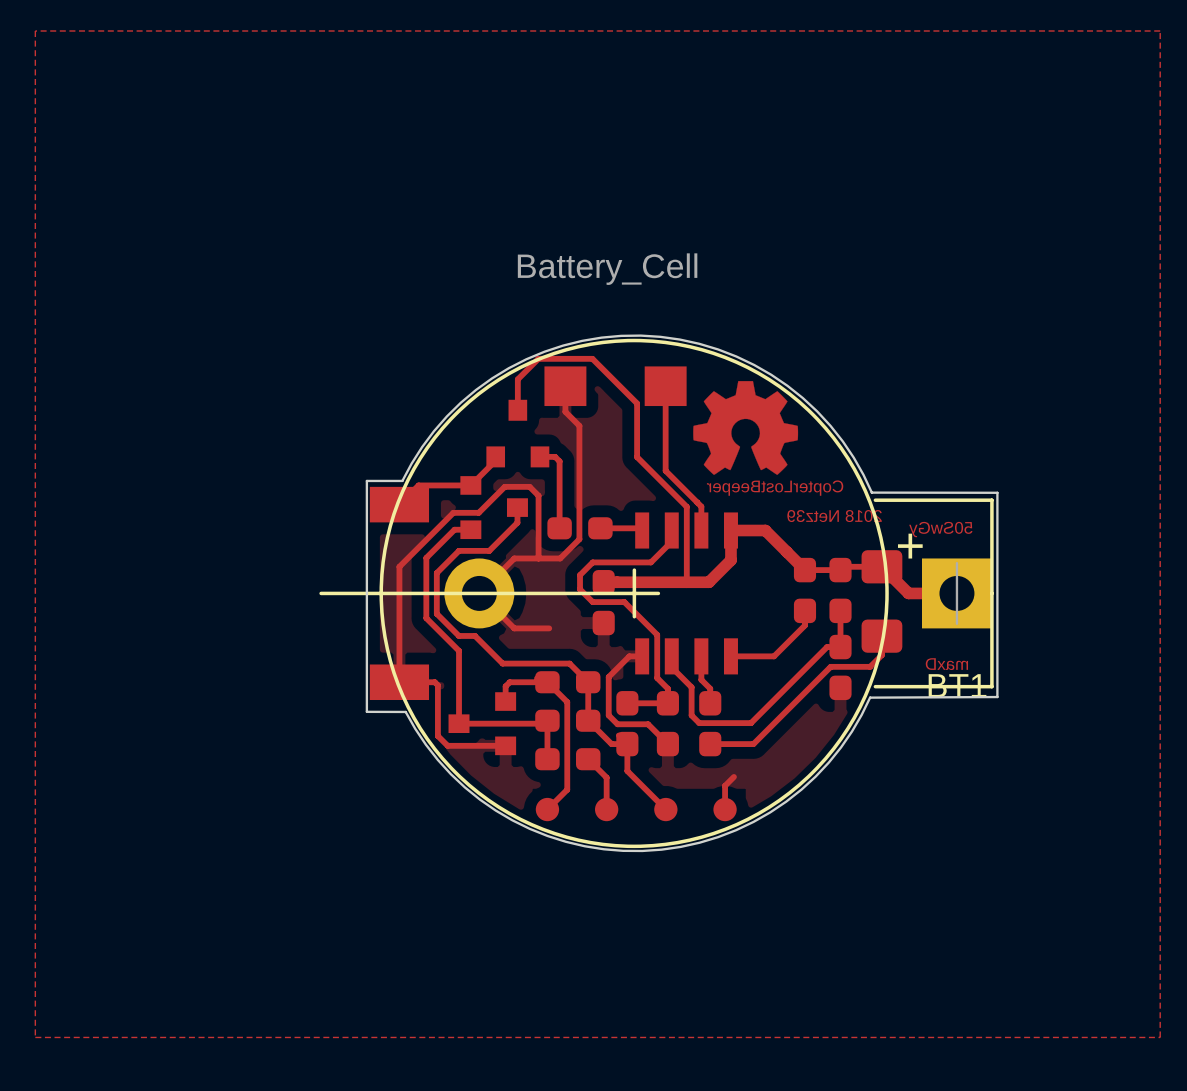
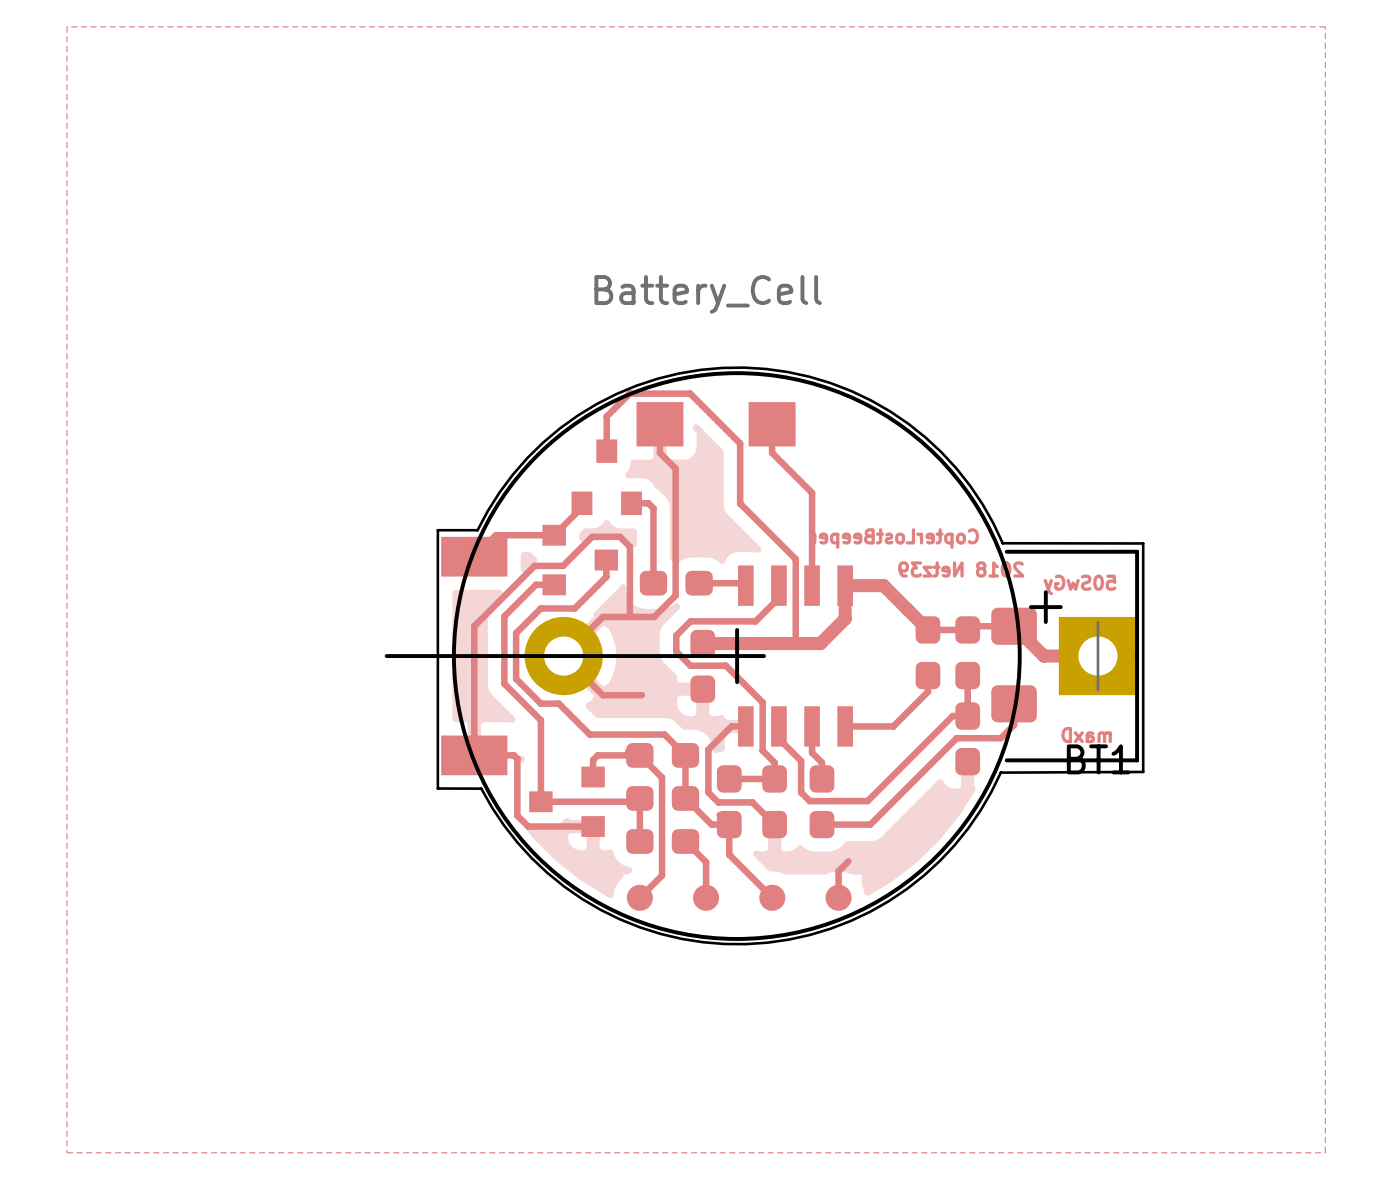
drawing: [693, 381, 799, 475] -> none
top track: (665, 411) (665, 470) (701, 506) -> (772, 452) (812, 492) (812, 558)

